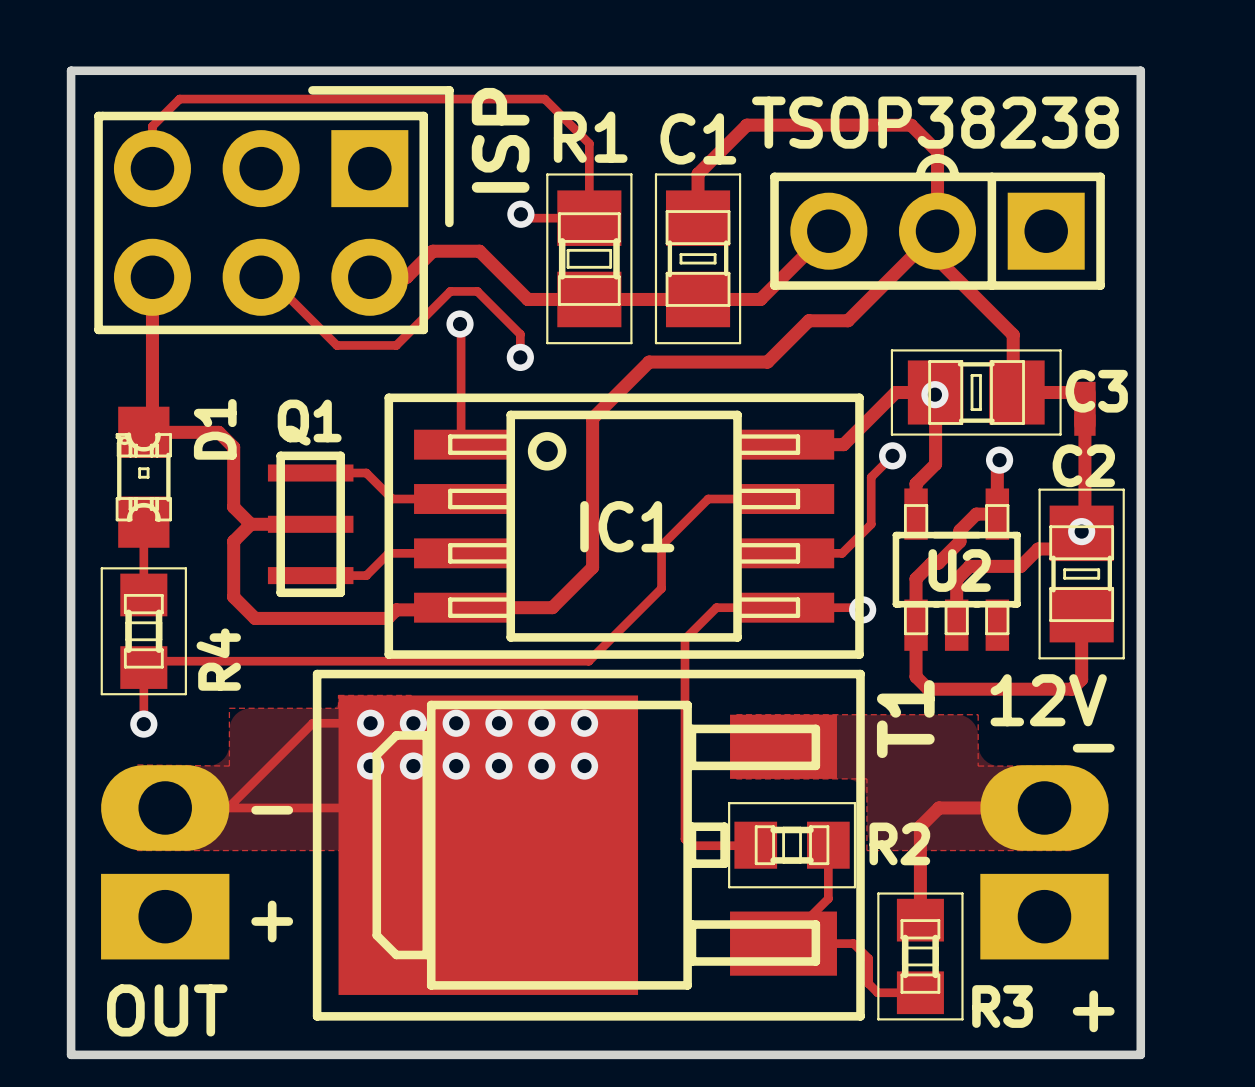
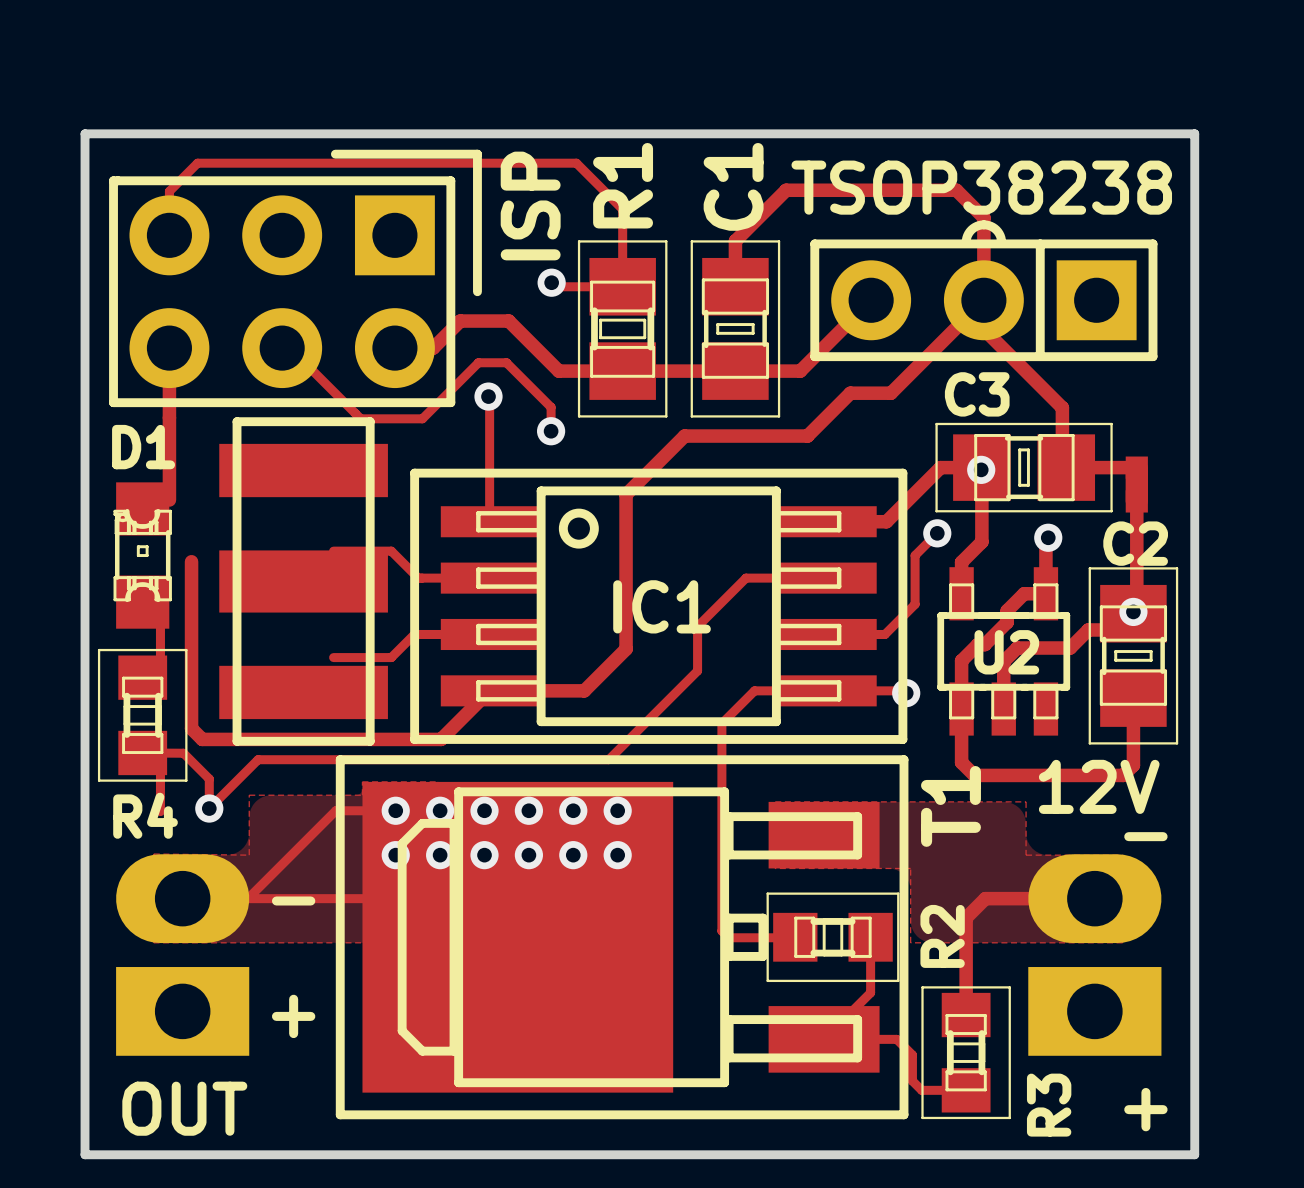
R1 name rotation: 0° (590, 137) -> 90° counterclockwise (623, 185)
C1 name rotation: 0° (698, 138) -> 90° counterclockwise (733, 186)
C3 name position: C3 (1096, 391) -> C3 (977, 394)
track: (157, 418) (143, 432) (218, 432) (233, 447) (233, 507) (250, 524) (233, 541) (233, 597) (255, 618) (387, 618) (396, 609) (458, 609) -> (191, 561) (191, 728) (202, 739) (441, 739) (487, 693)
D1 name rotation: 0° (215, 429) -> 90° clockwise (143, 447)
D1 name position: D1 (215, 429) -> D1 (143, 447)
D1 position: (143, 477) -> (142, 555)
part: none -> (303, 581)
Q1: (310, 524) -> none
R4 position: (143, 631) -> (142, 715)
R4 name rotation: 0° (218, 659) -> 90° clockwise (145, 815)
R4 name position: R4 (218, 659) -> R4 (145, 815)
track: (158, 661) (588, 661) -> (142, 752) (183, 753) (209, 778) (209, 808) (258, 759) (608, 759) (622, 746)
via position: (143, 724) -> (209, 808)
R2 name rotation: 0° (899, 843) -> 90° counterclockwise (942, 936)
R3 name rotation: 0° (1002, 1006) -> 90° counterclockwise (1049, 1105)

